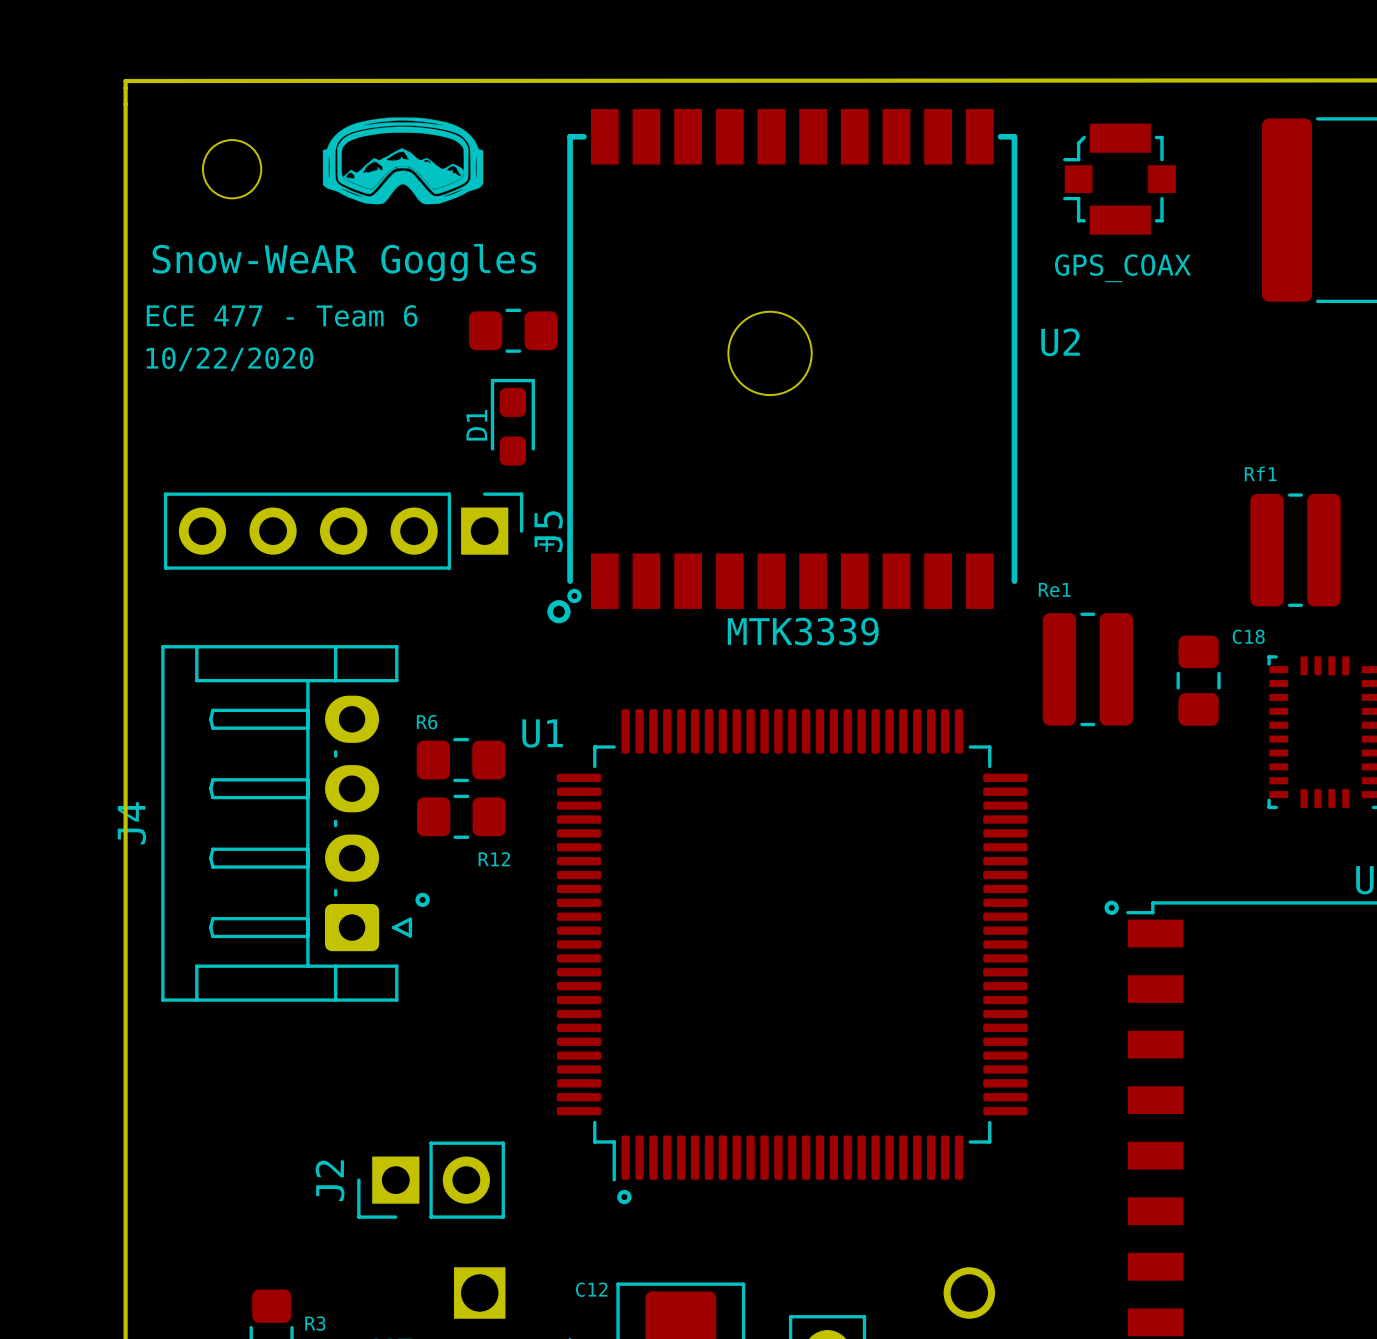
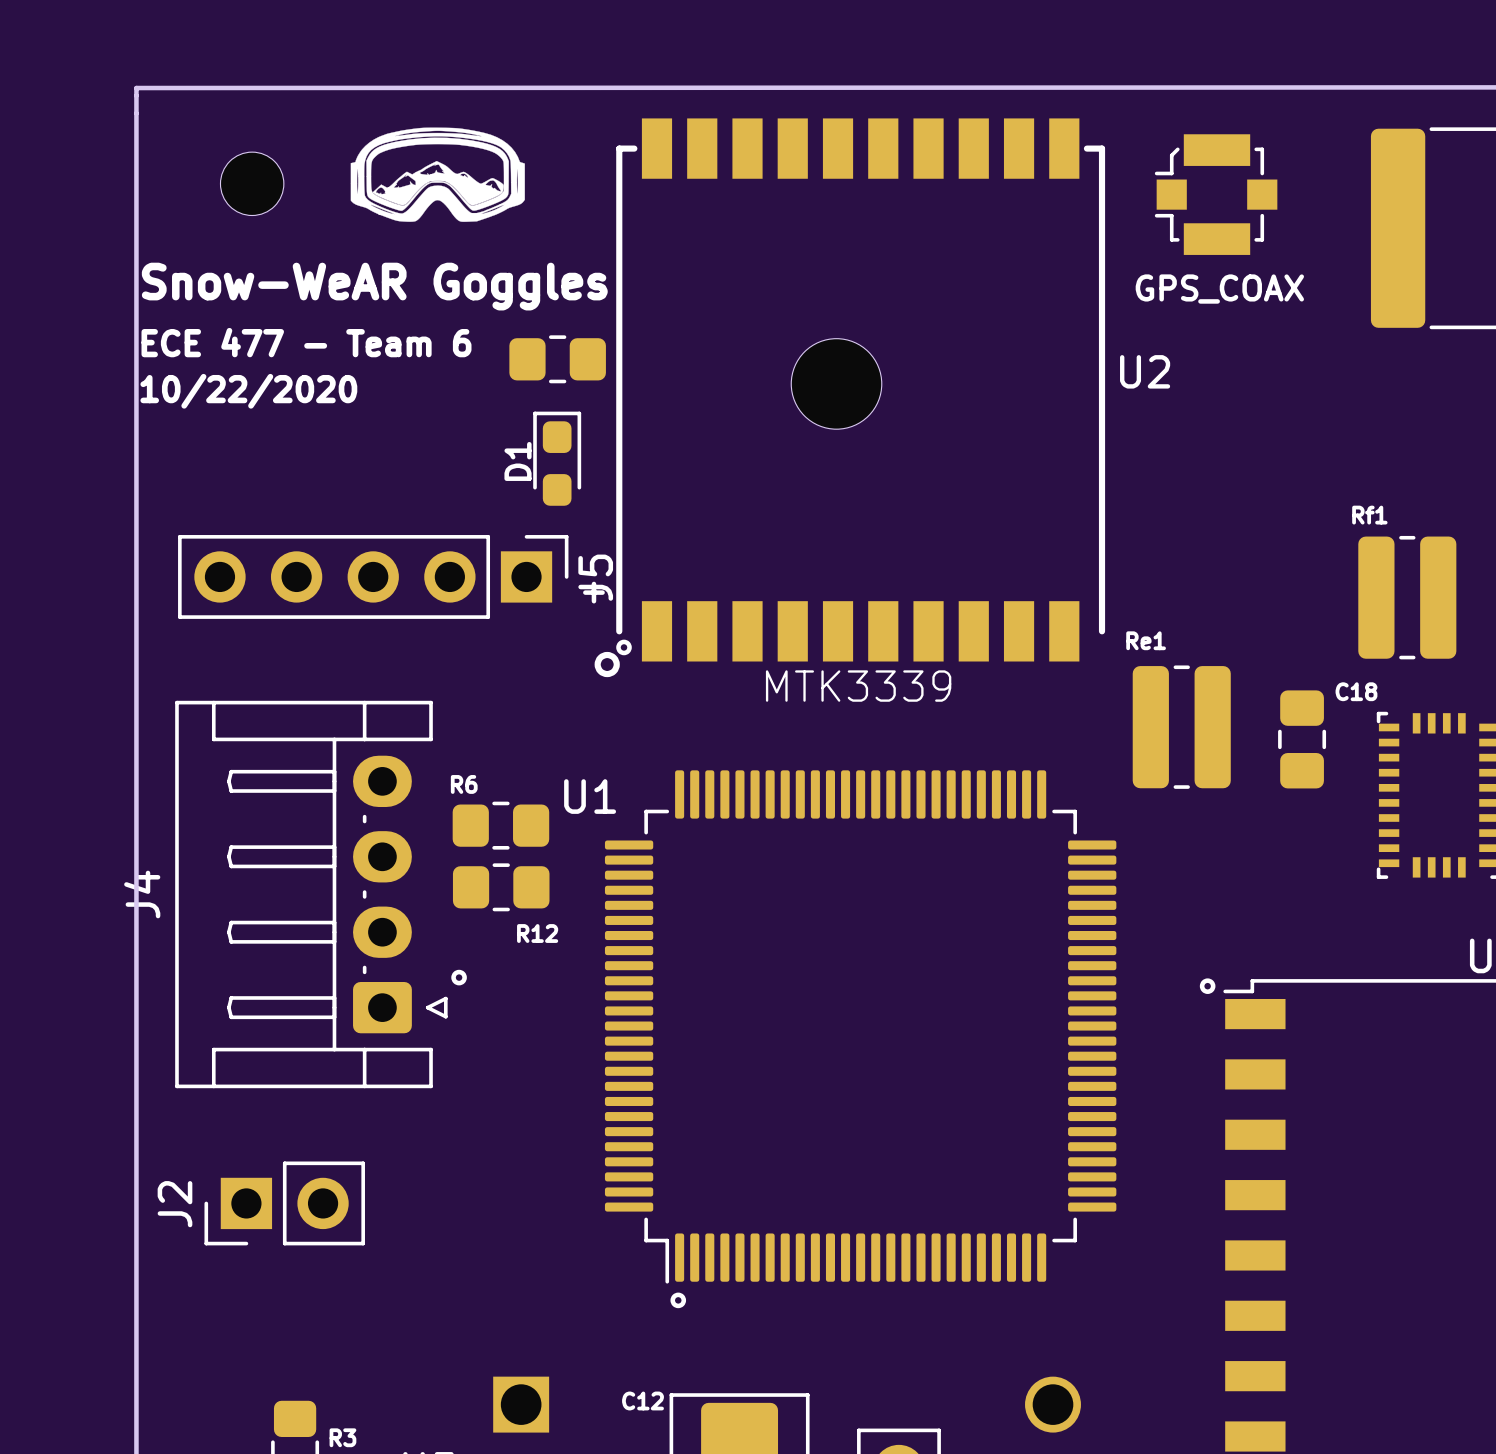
J2 position: (431, 1180) -> (284, 1203)

